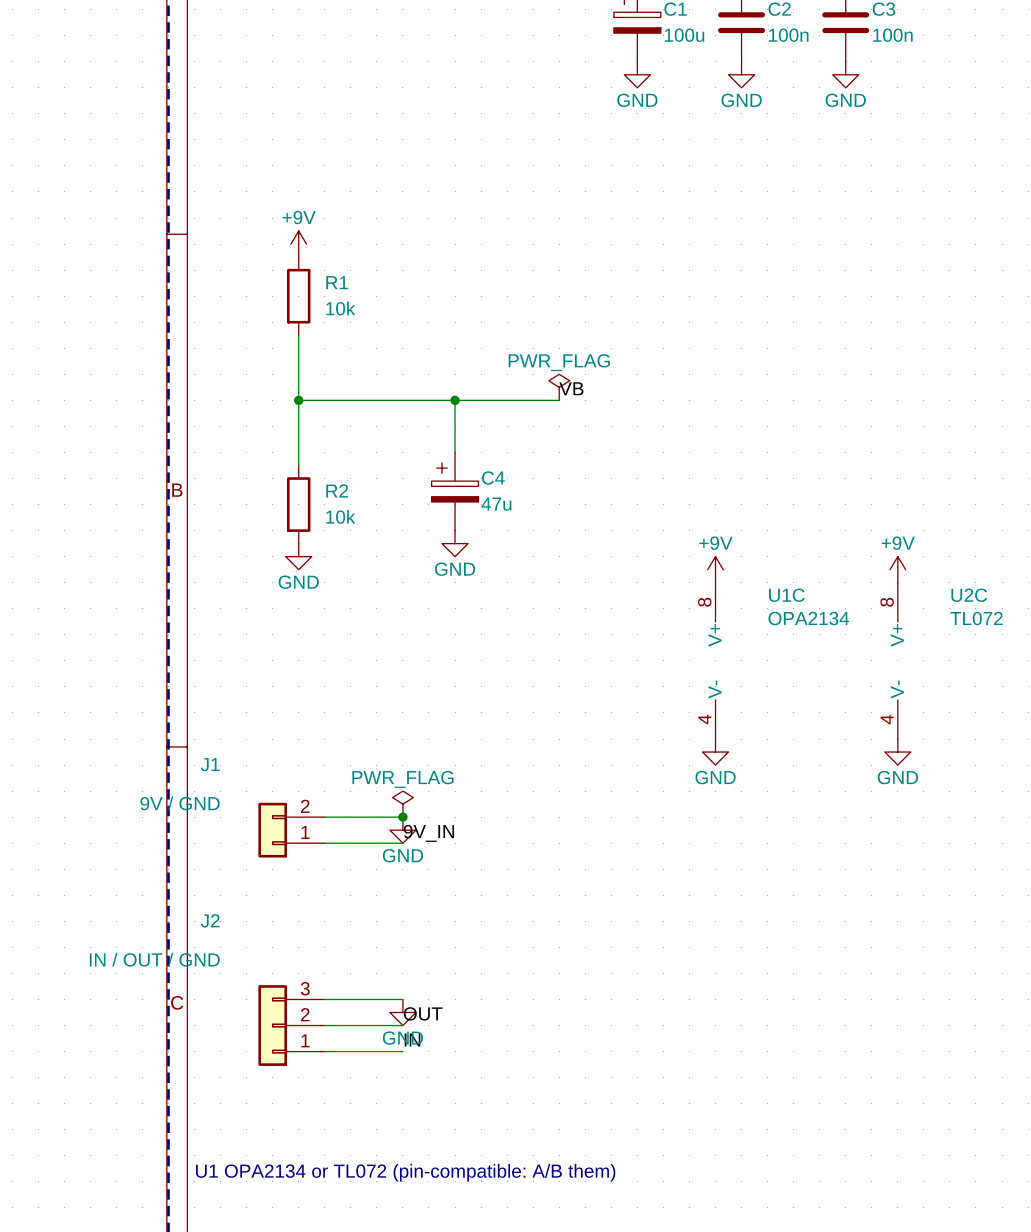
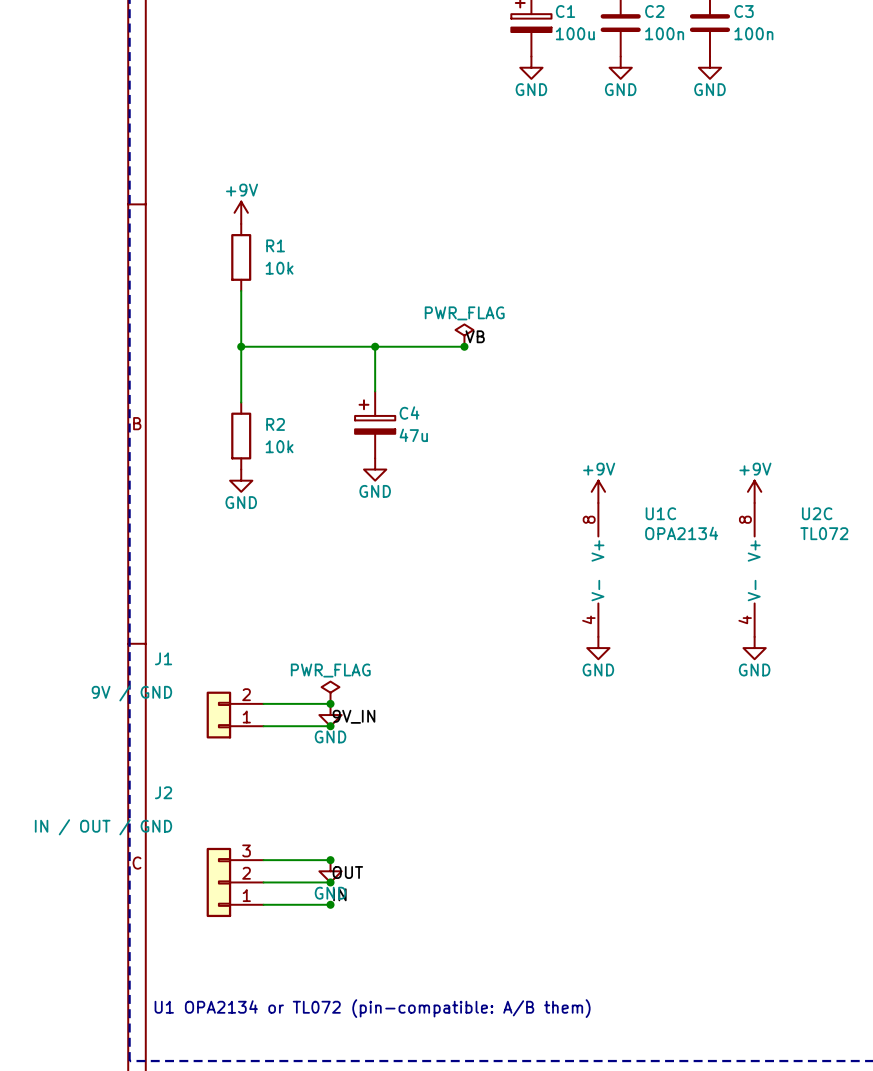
junction: none -> (464, 346)
junction: none -> (330, 726)
junction: none -> (330, 860)
junction: none -> (330, 882)
junction: none -> (330, 904)

